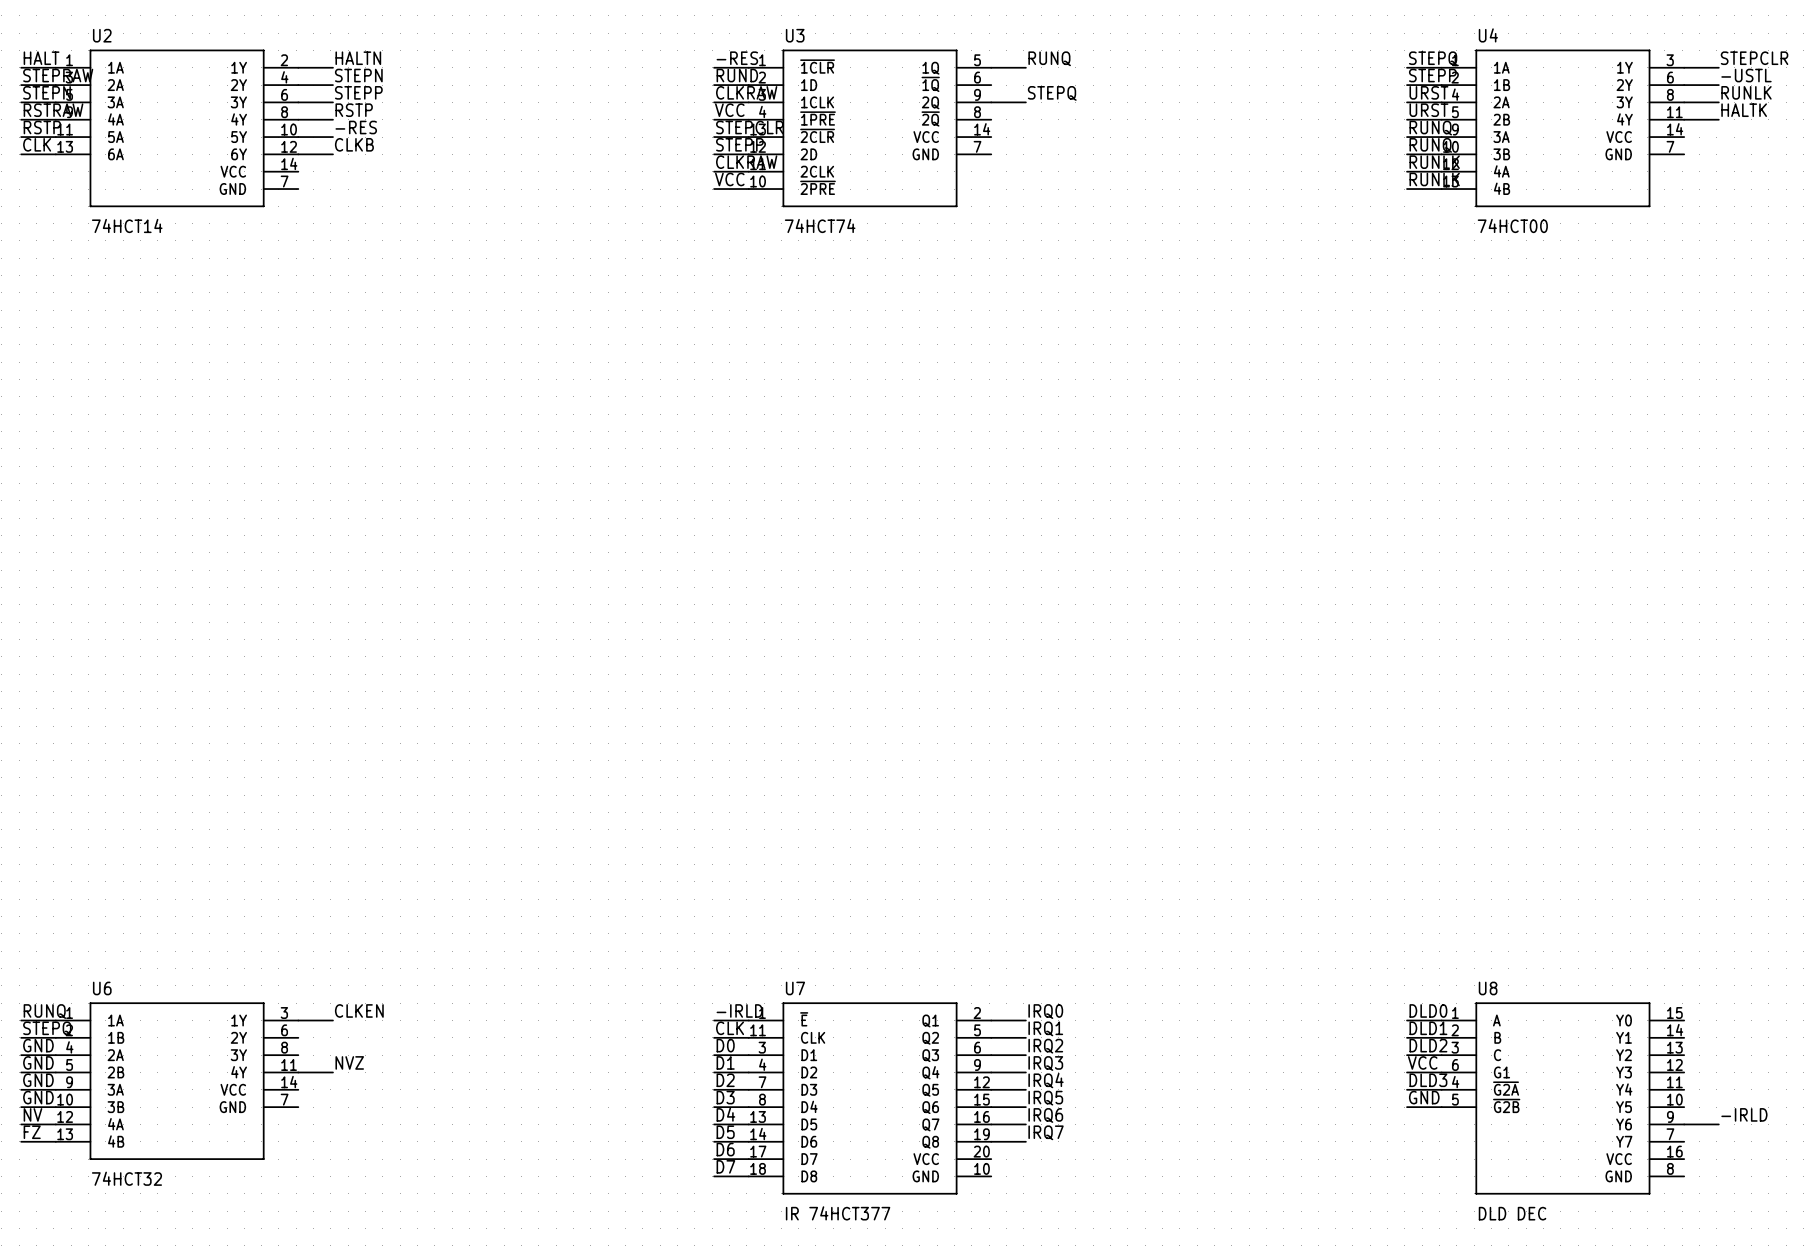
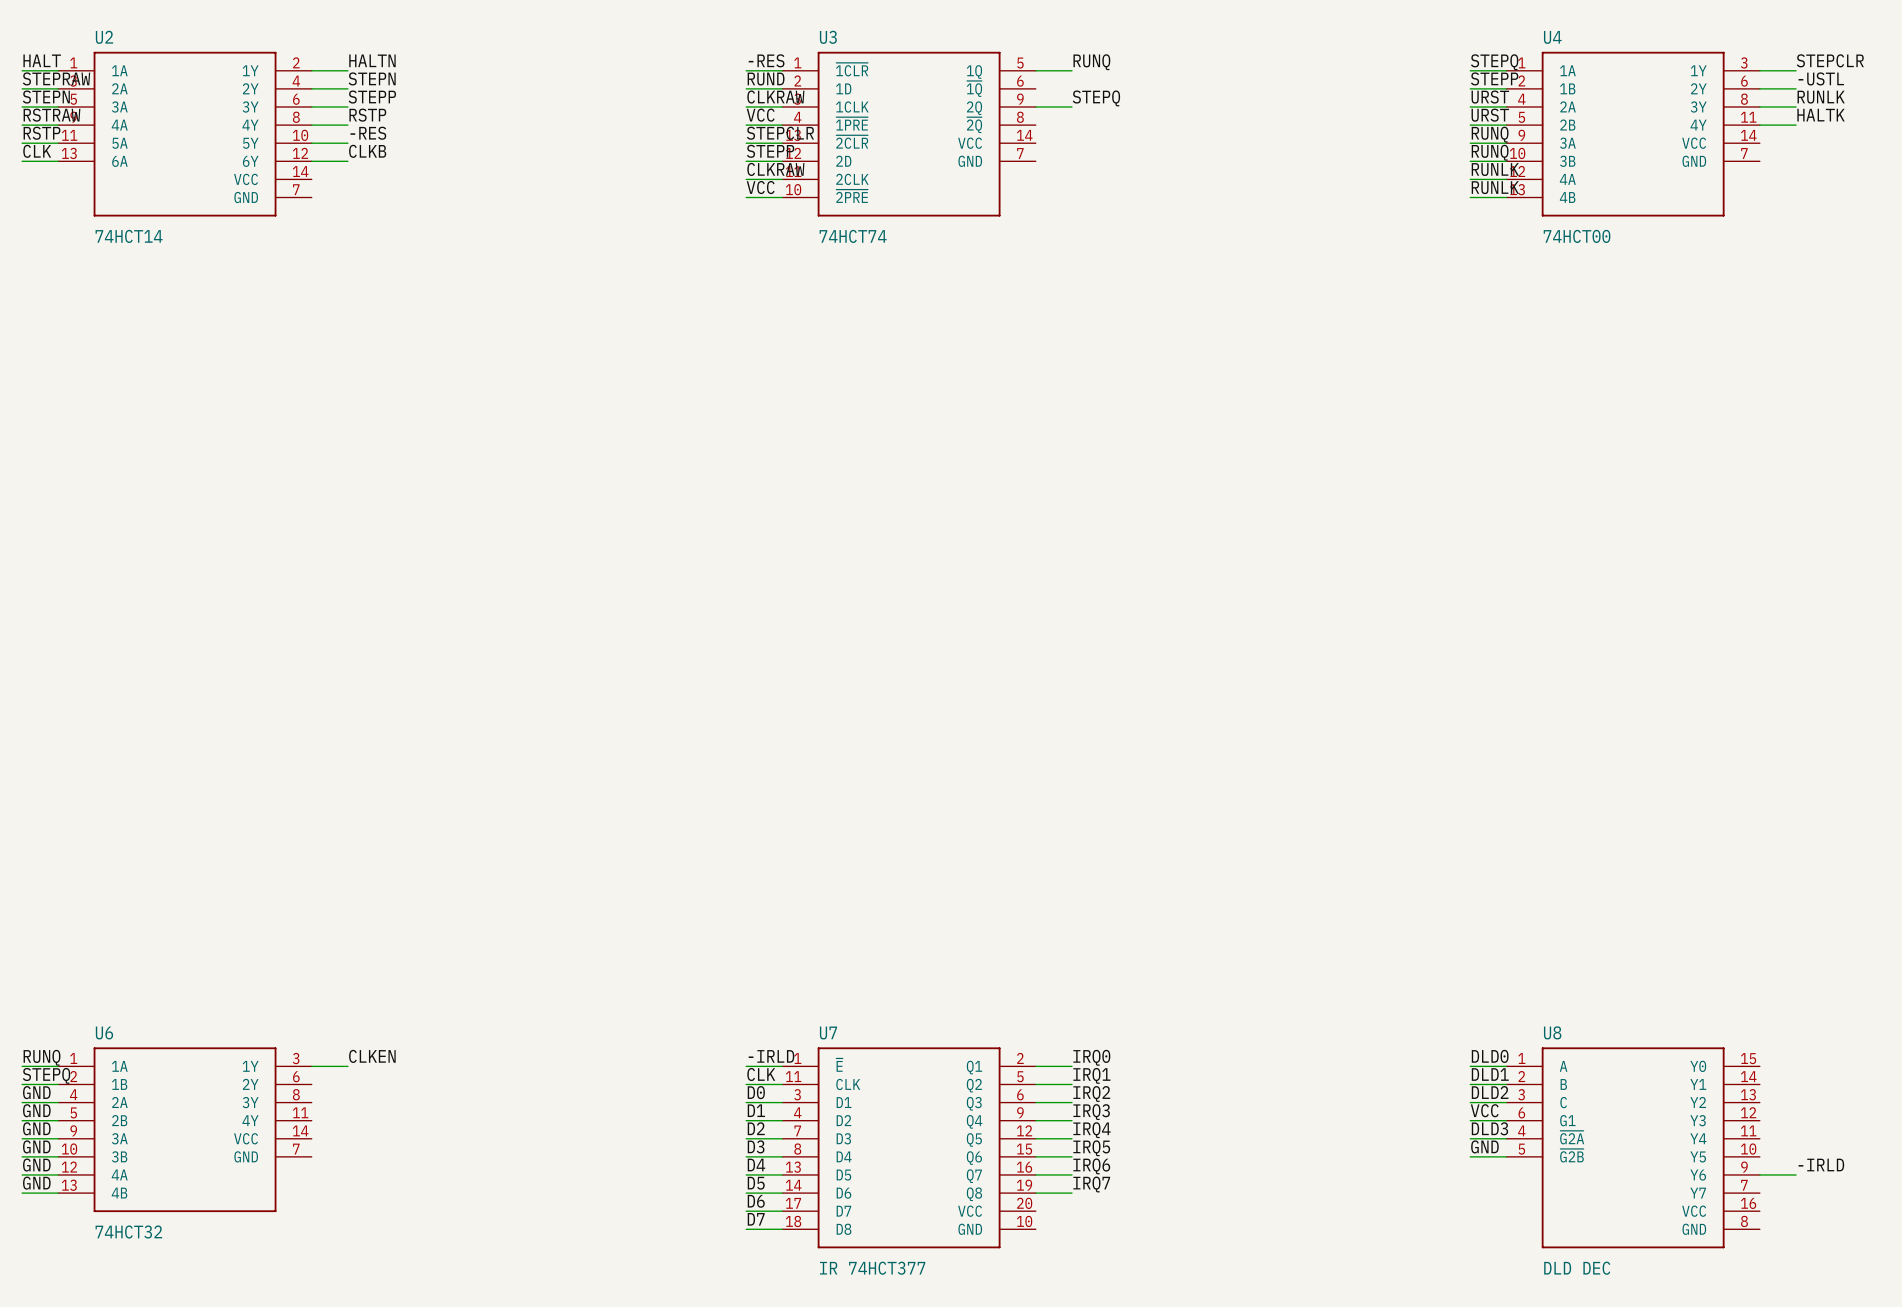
label: NVZ (349, 1062) -> none
wire: (298, 1072) (332, 1072) -> none
label: NV (32, 1114) -> GND (36, 1165)
label: FZ (32, 1132) -> GND (36, 1183)

